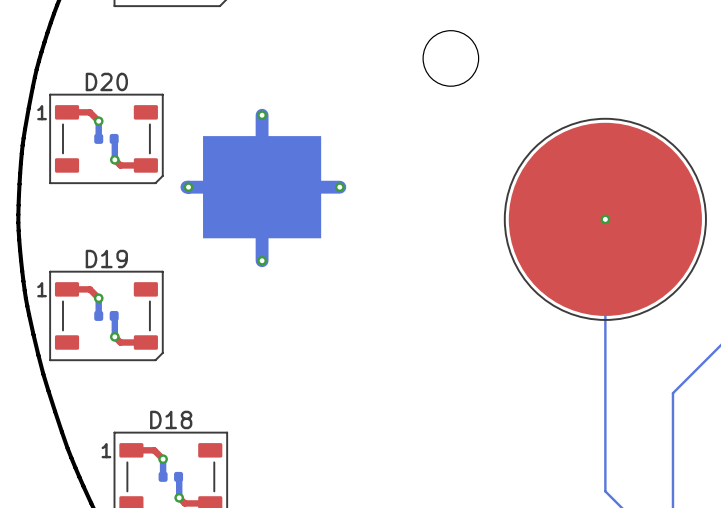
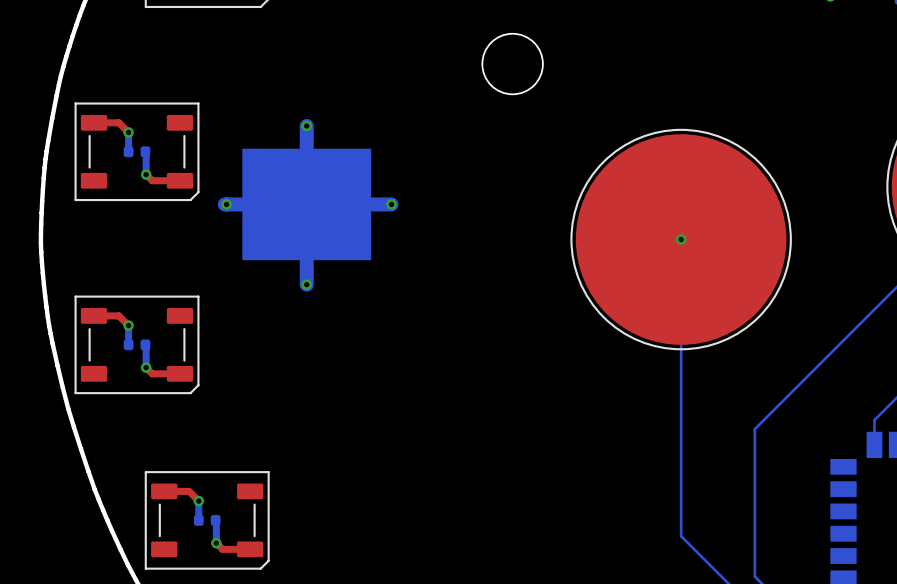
D20 name: D20 (106, 81) -> none
D20 text: 1 (42, 112) -> none
D19 name: D19 (106, 259) -> none
D19 text: 1 (42, 289) -> none
D18 name: D18 (171, 419) -> none
D18 text: 1 (106, 450) -> none

